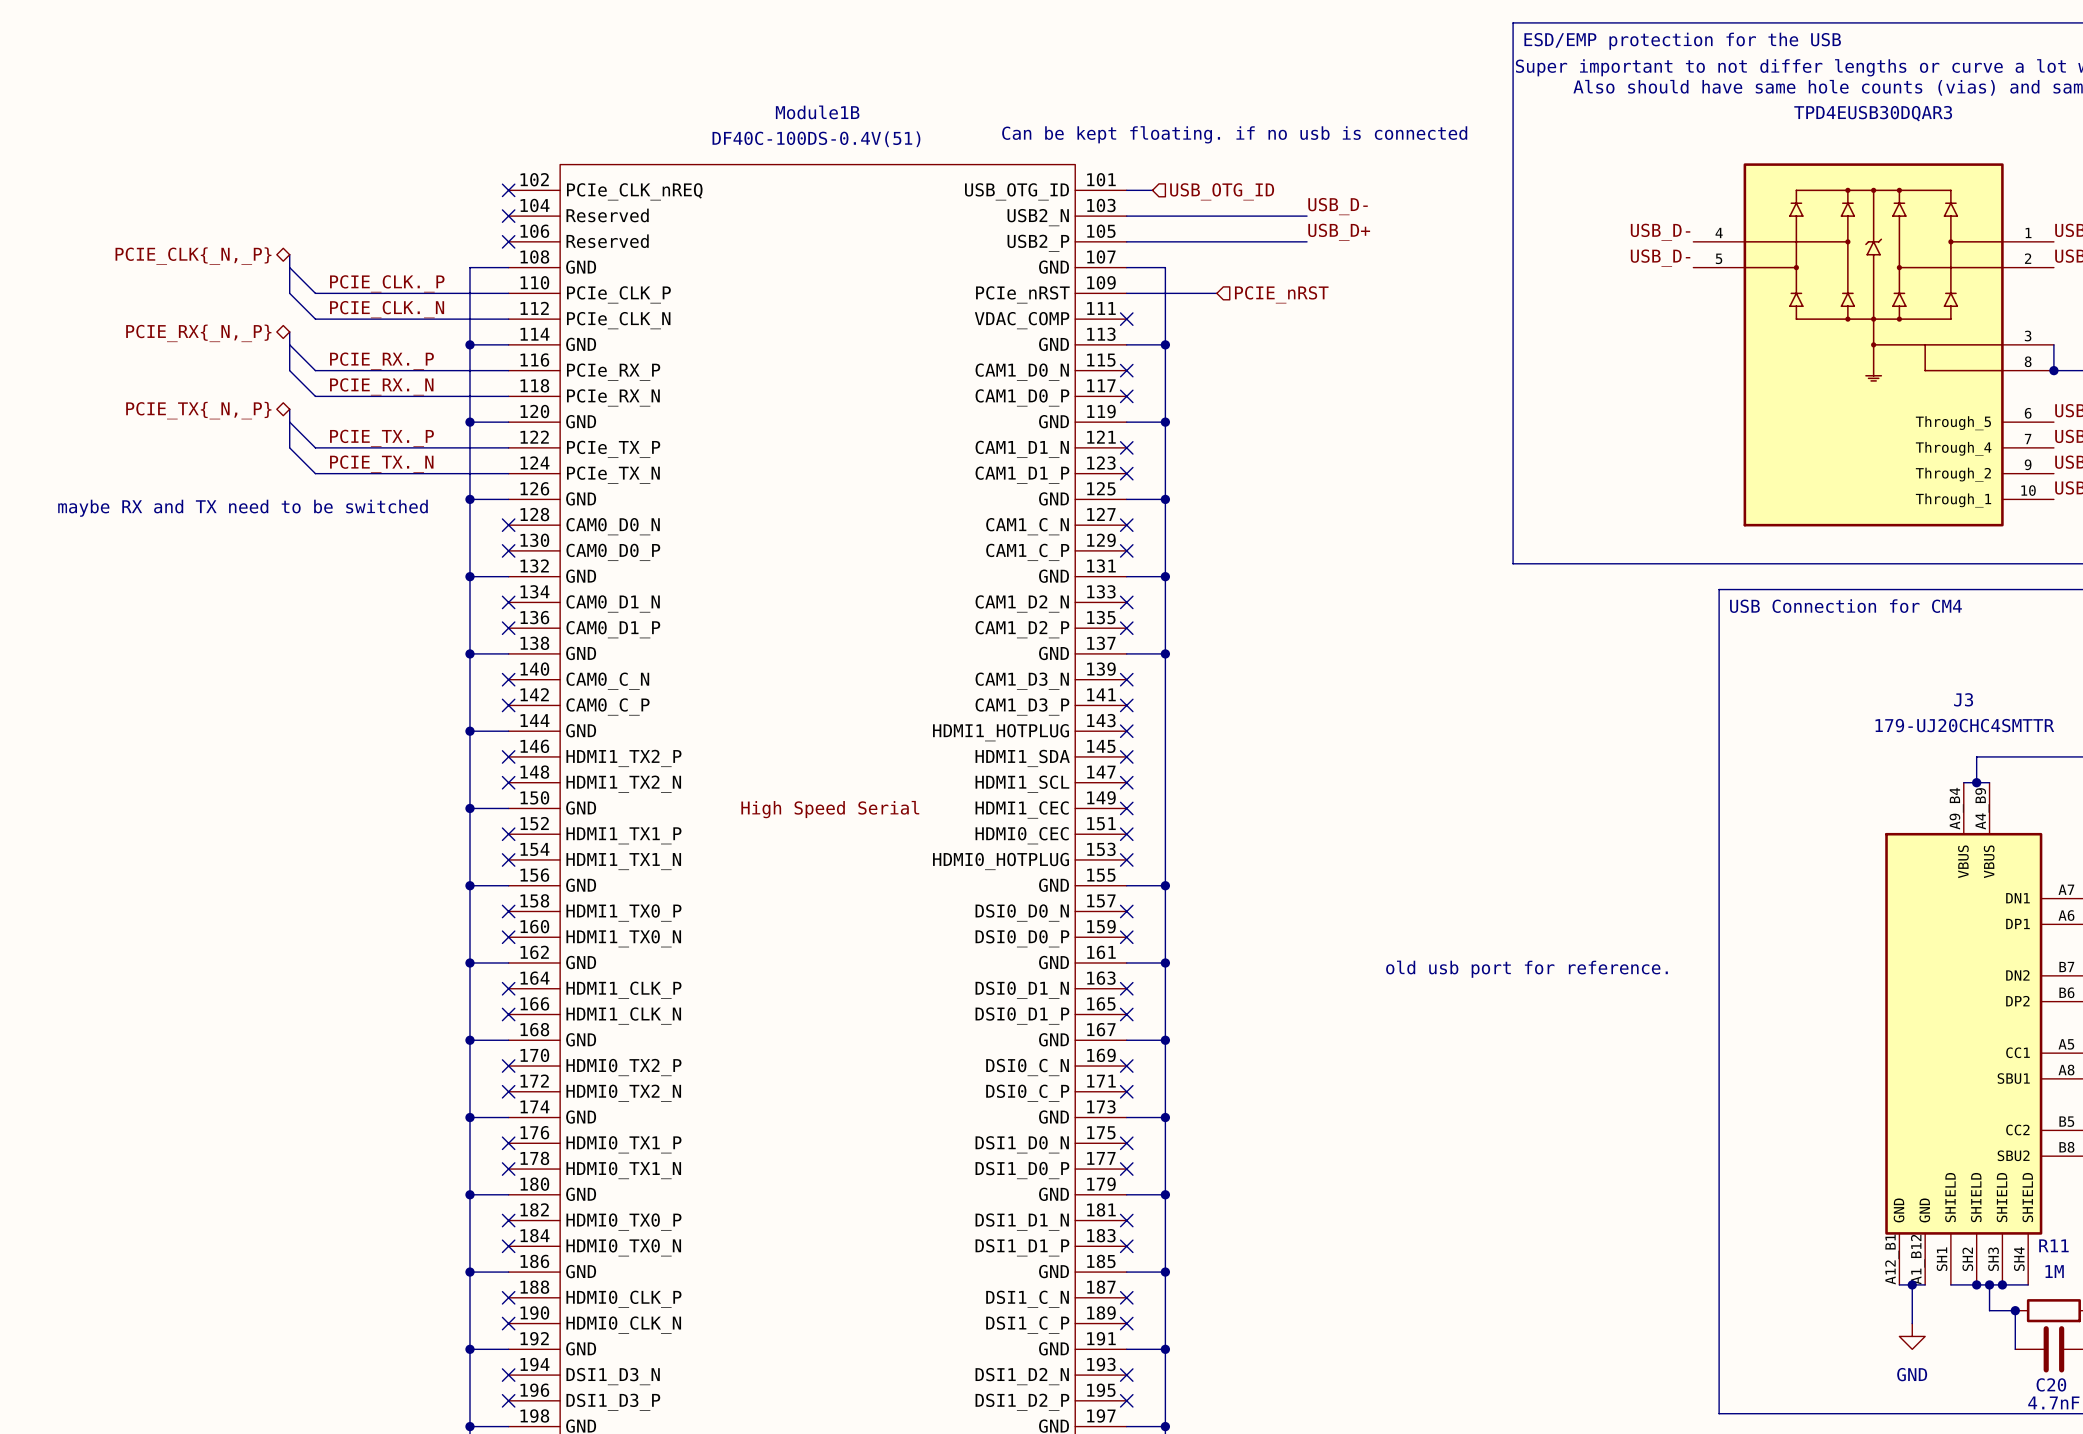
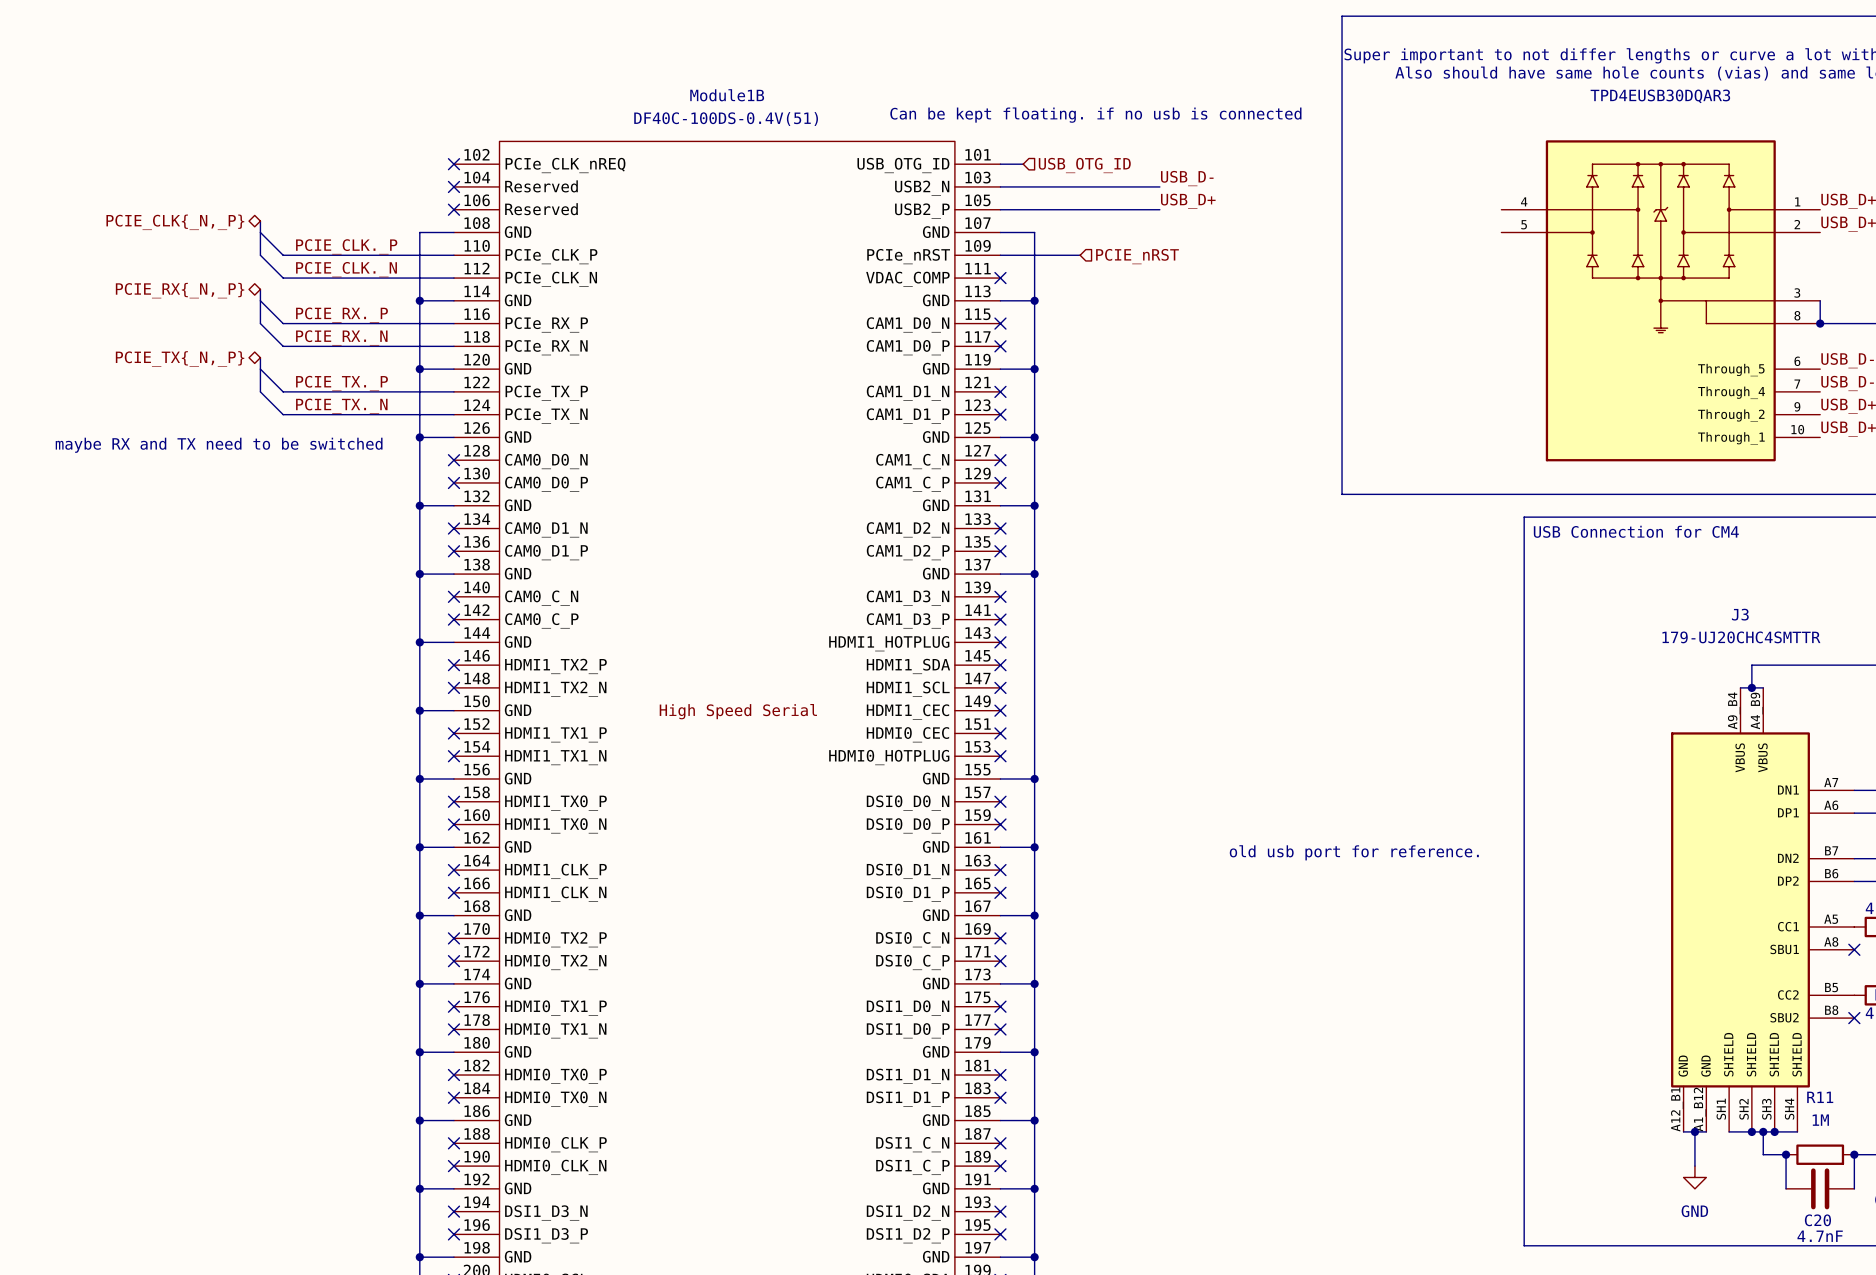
text: ESD/EMP protection for the USB (1682, 41) -> none
label: USB_D- (1660, 232) -> none
label: USB_D- (1660, 258) -> none

